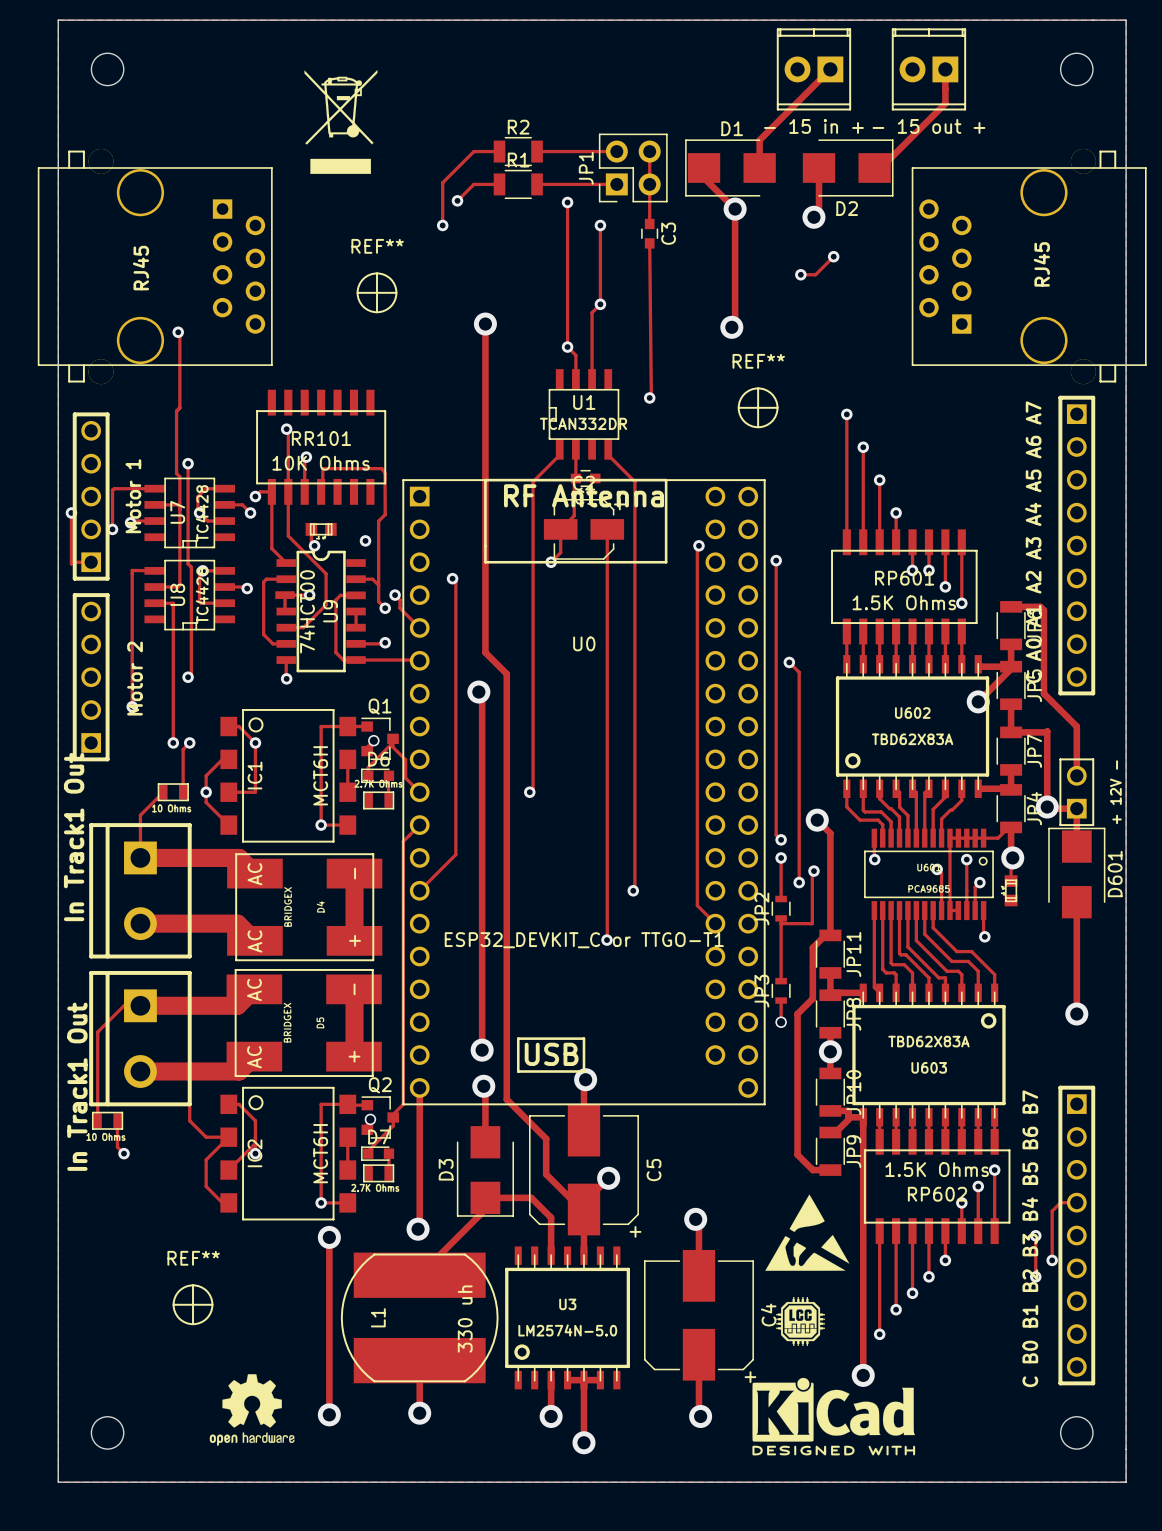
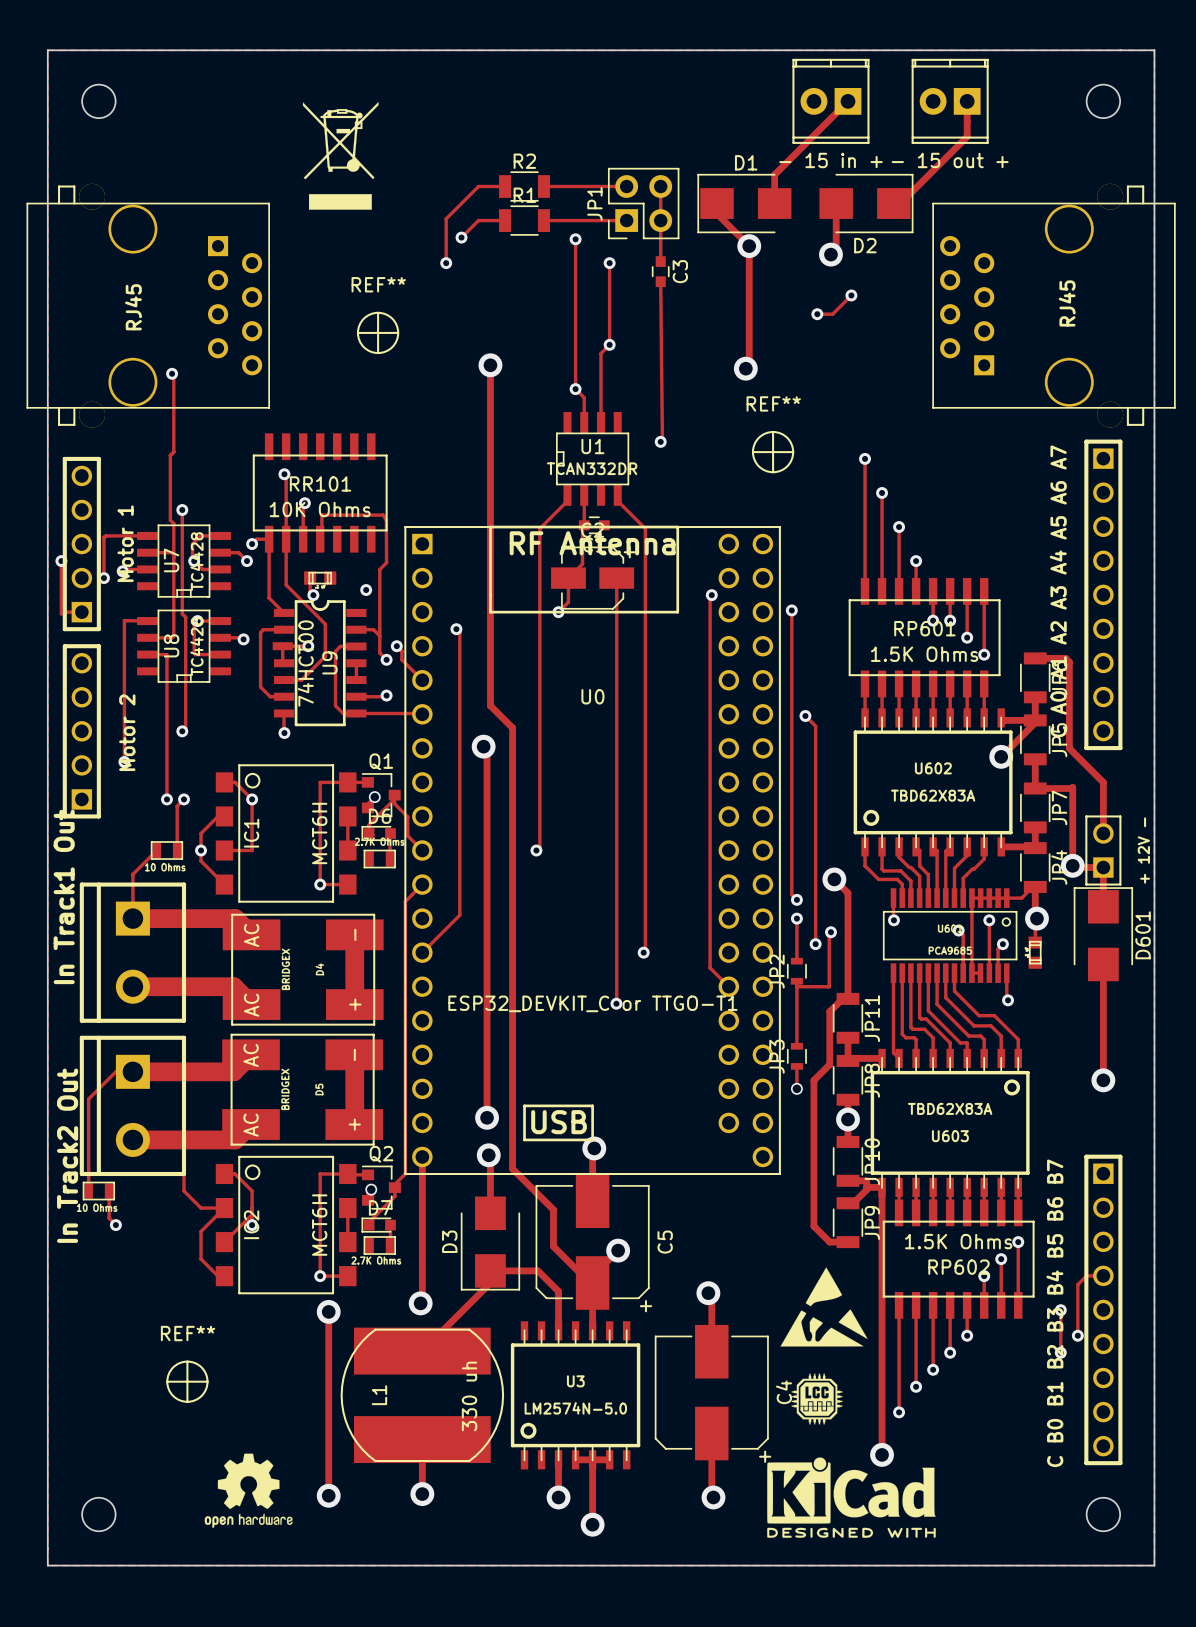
part value: In Track1 Out (77, 1086) -> In Track2 Out (67, 1155)

